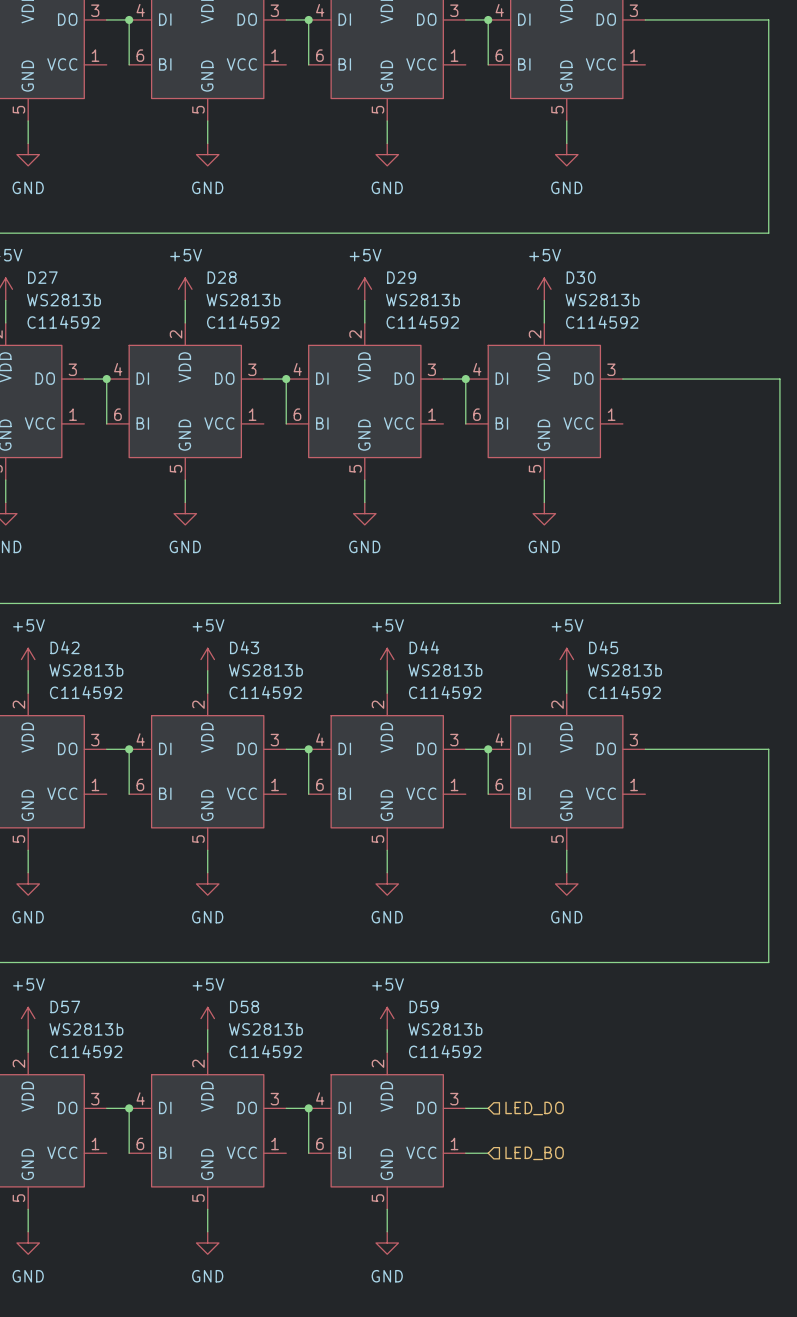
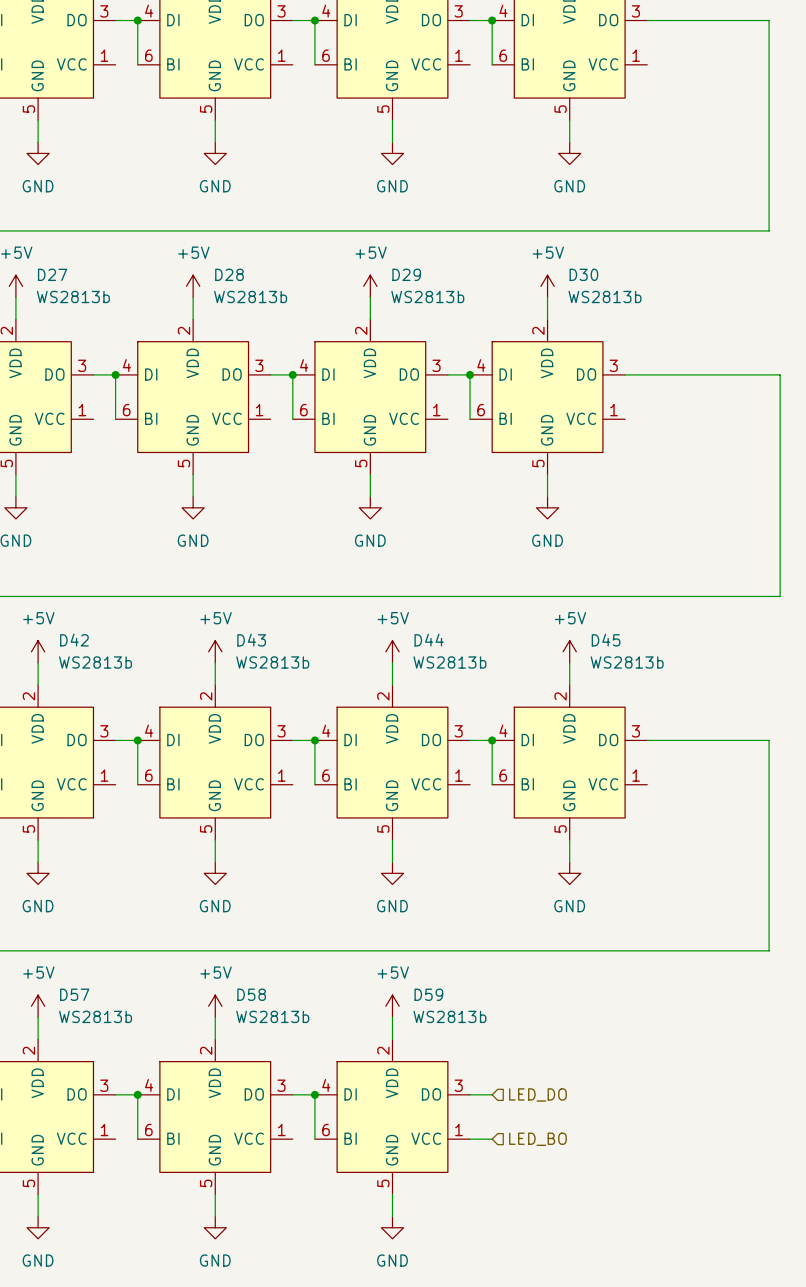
D27 text: C114592 (63, 322) -> none
D28 text: C114592 (243, 322) -> none
D29 text: C114592 (422, 322) -> none
D30 text: C114592 (602, 322) -> none
D42 text: C114592 (86, 692) -> none
D43 text: C114592 (265, 692) -> none
D44 text: C114592 (445, 692) -> none
D45 text: C114592 (624, 692) -> none
D57 text: C114592 (86, 1051) -> none
D58 text: C114592 (265, 1051) -> none
D59 text: C114592 (445, 1051) -> none

